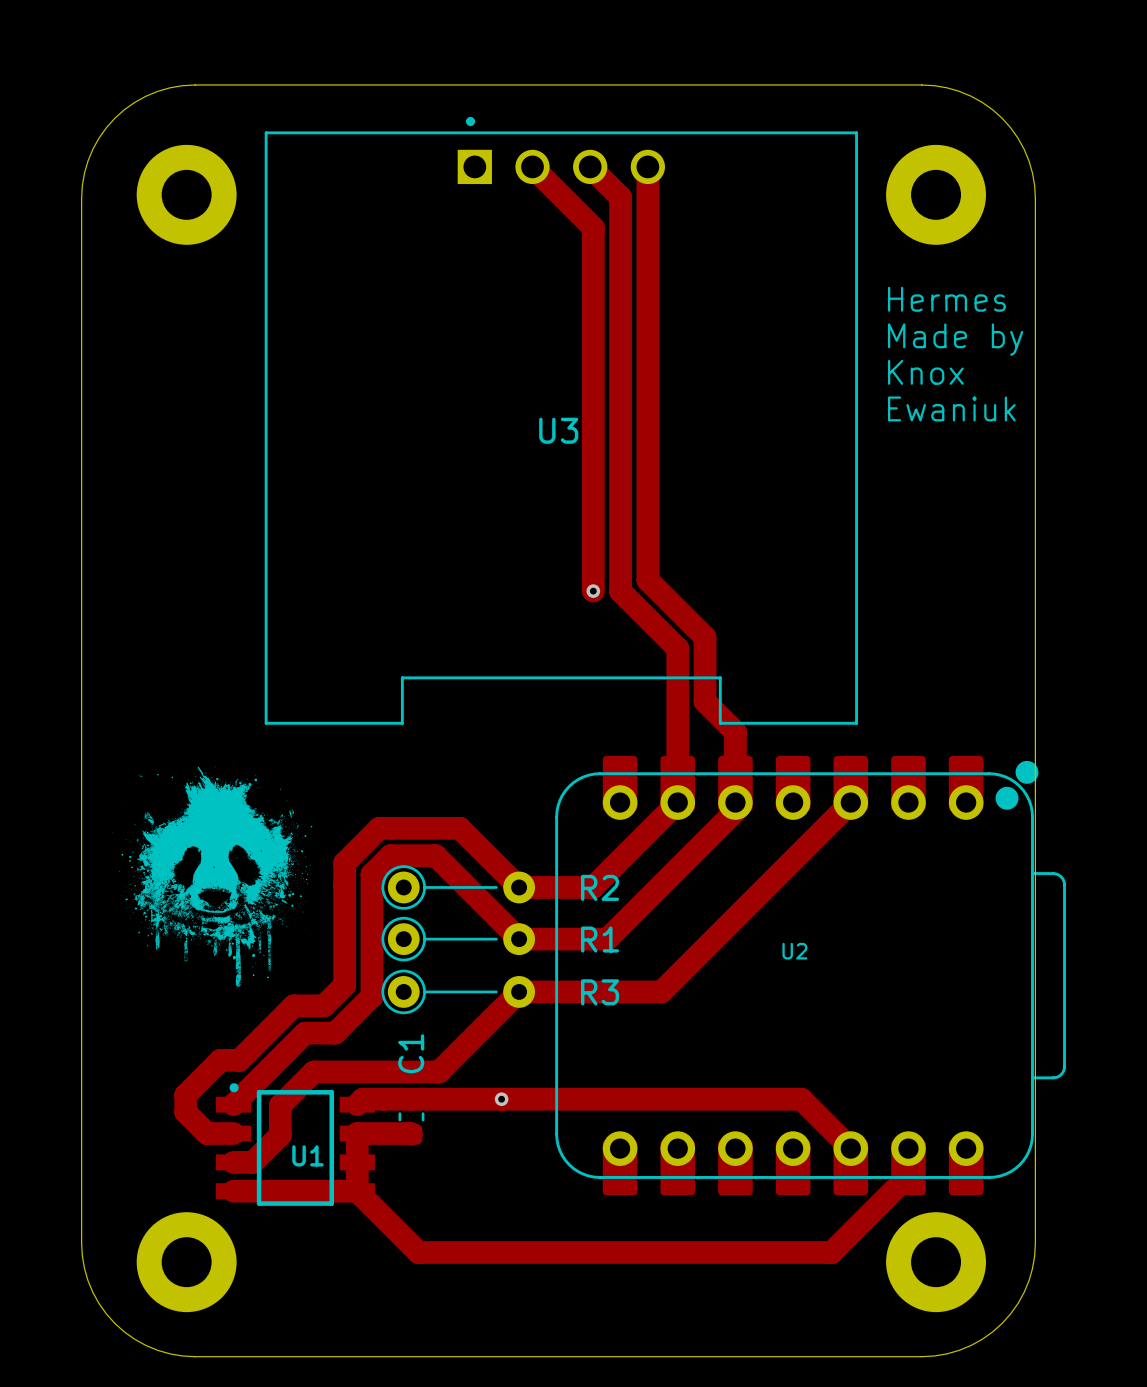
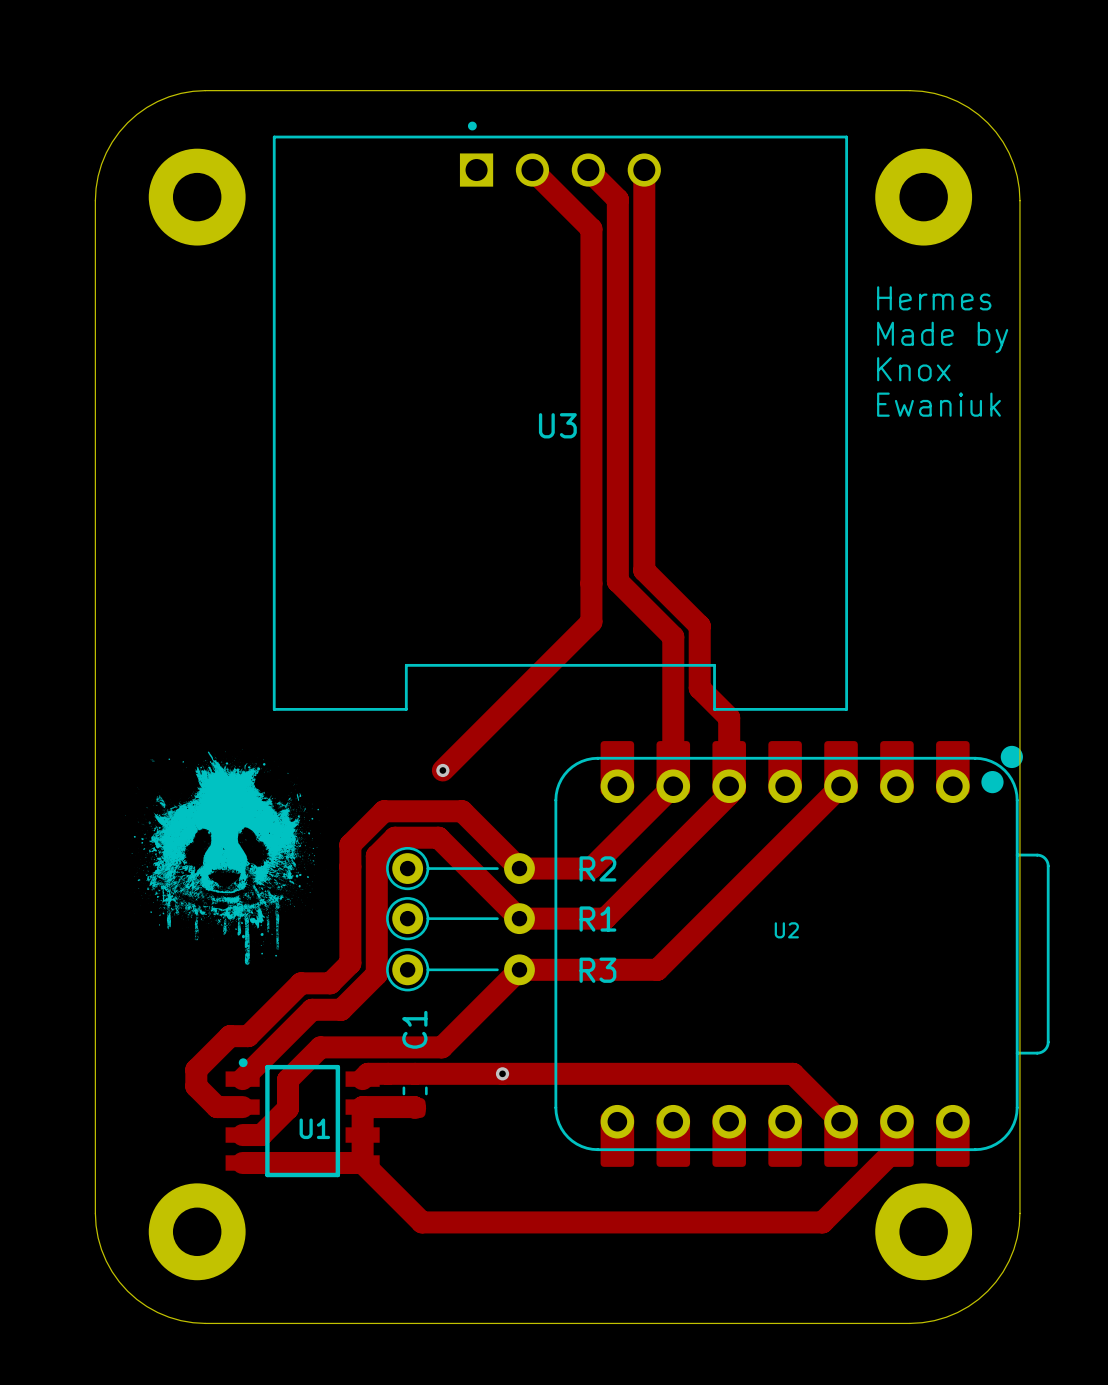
track: none -> (591, 581) (591, 621) (442, 770)
via: (593, 591) -> none
via: none -> (442, 770)

